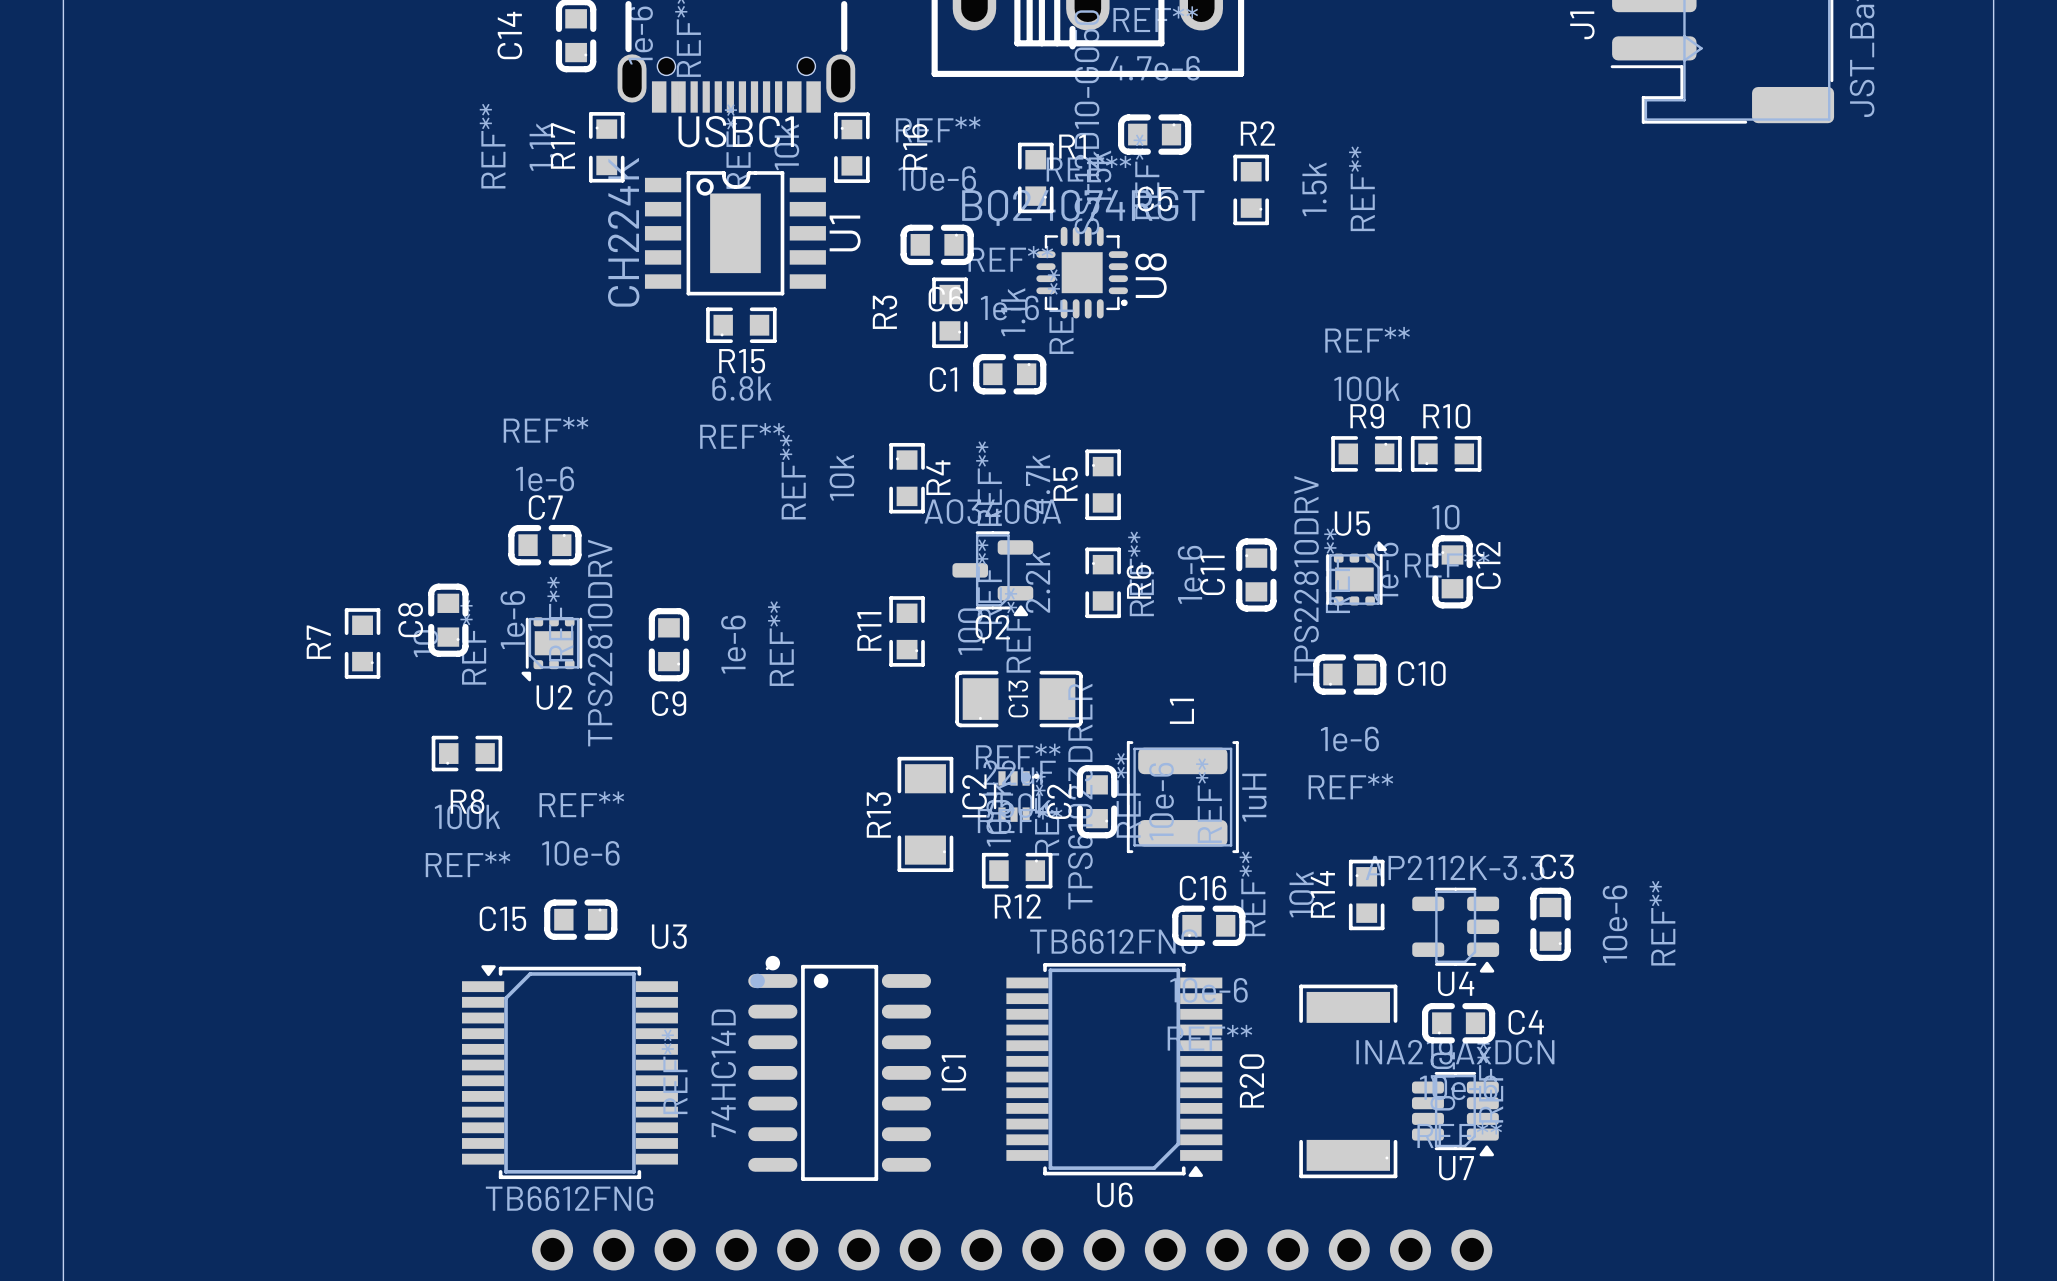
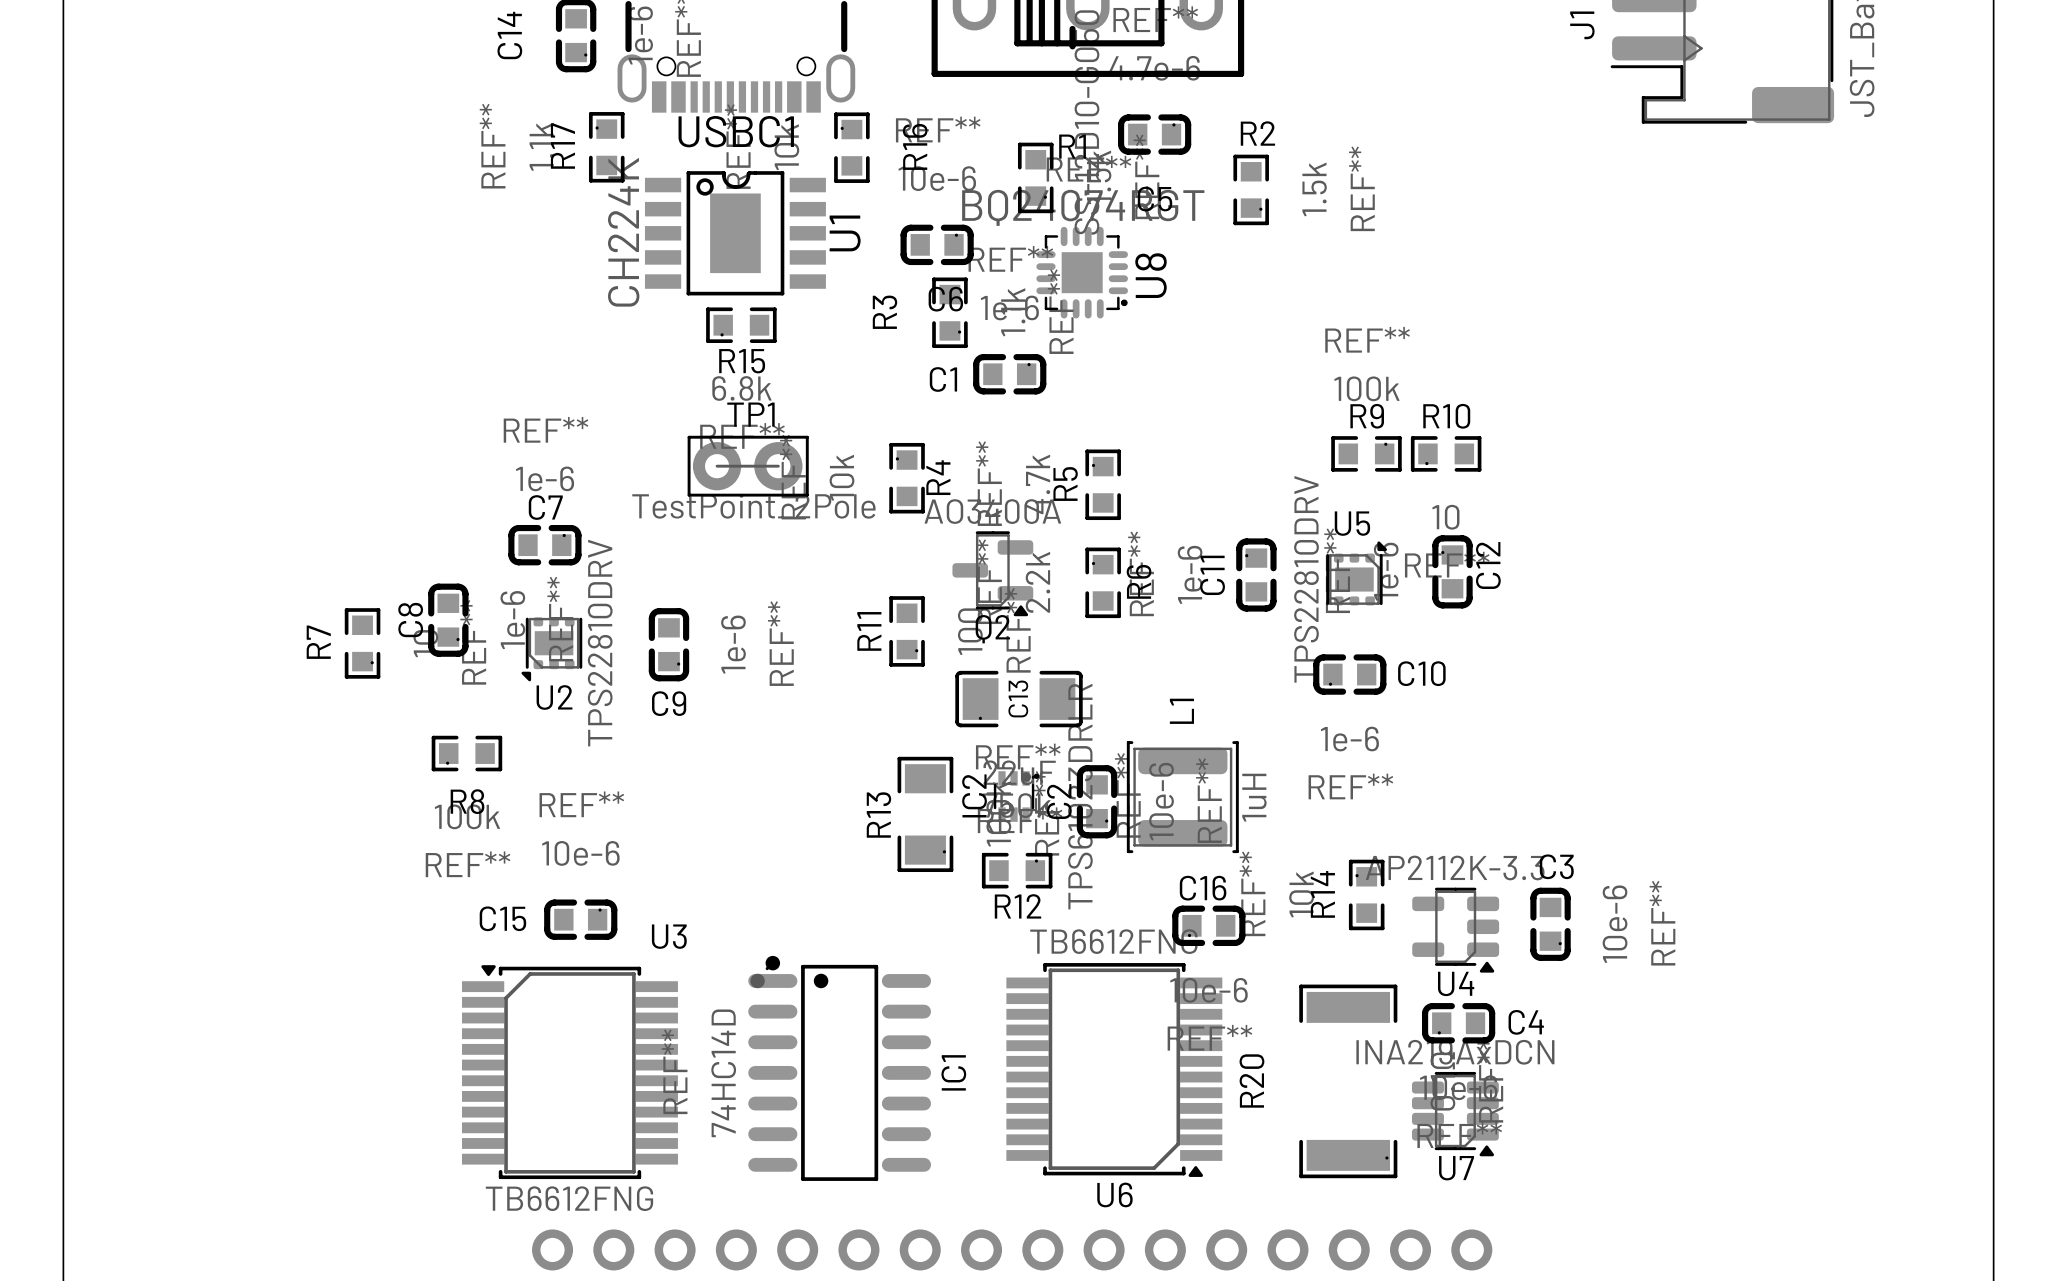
TP1: none -> TestPoint_2Pole (748, 466)

